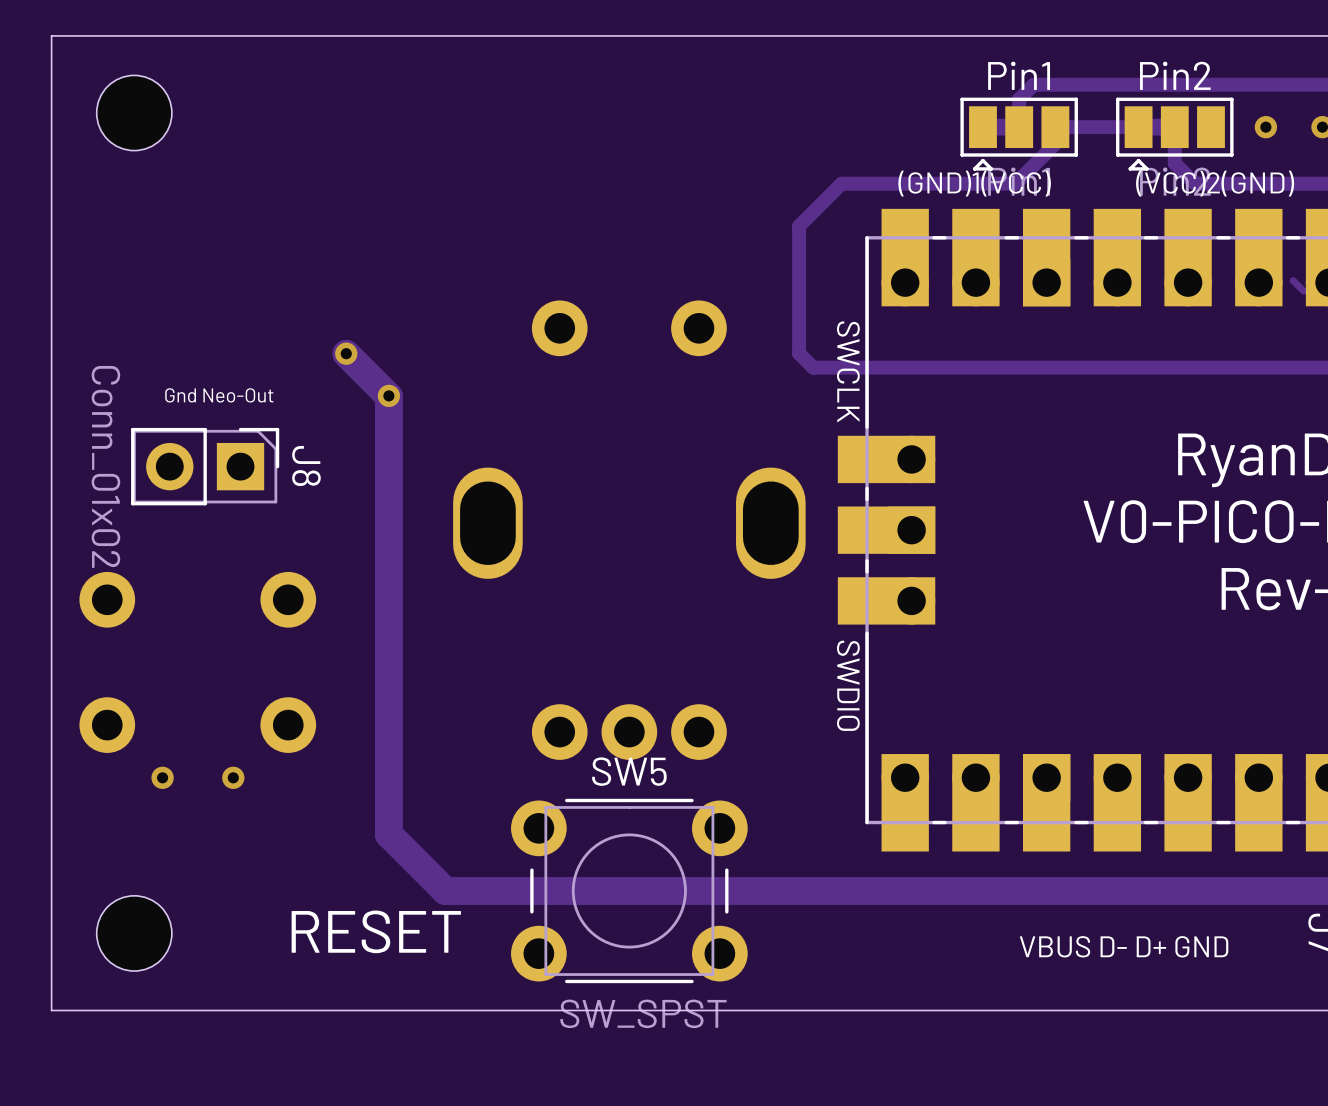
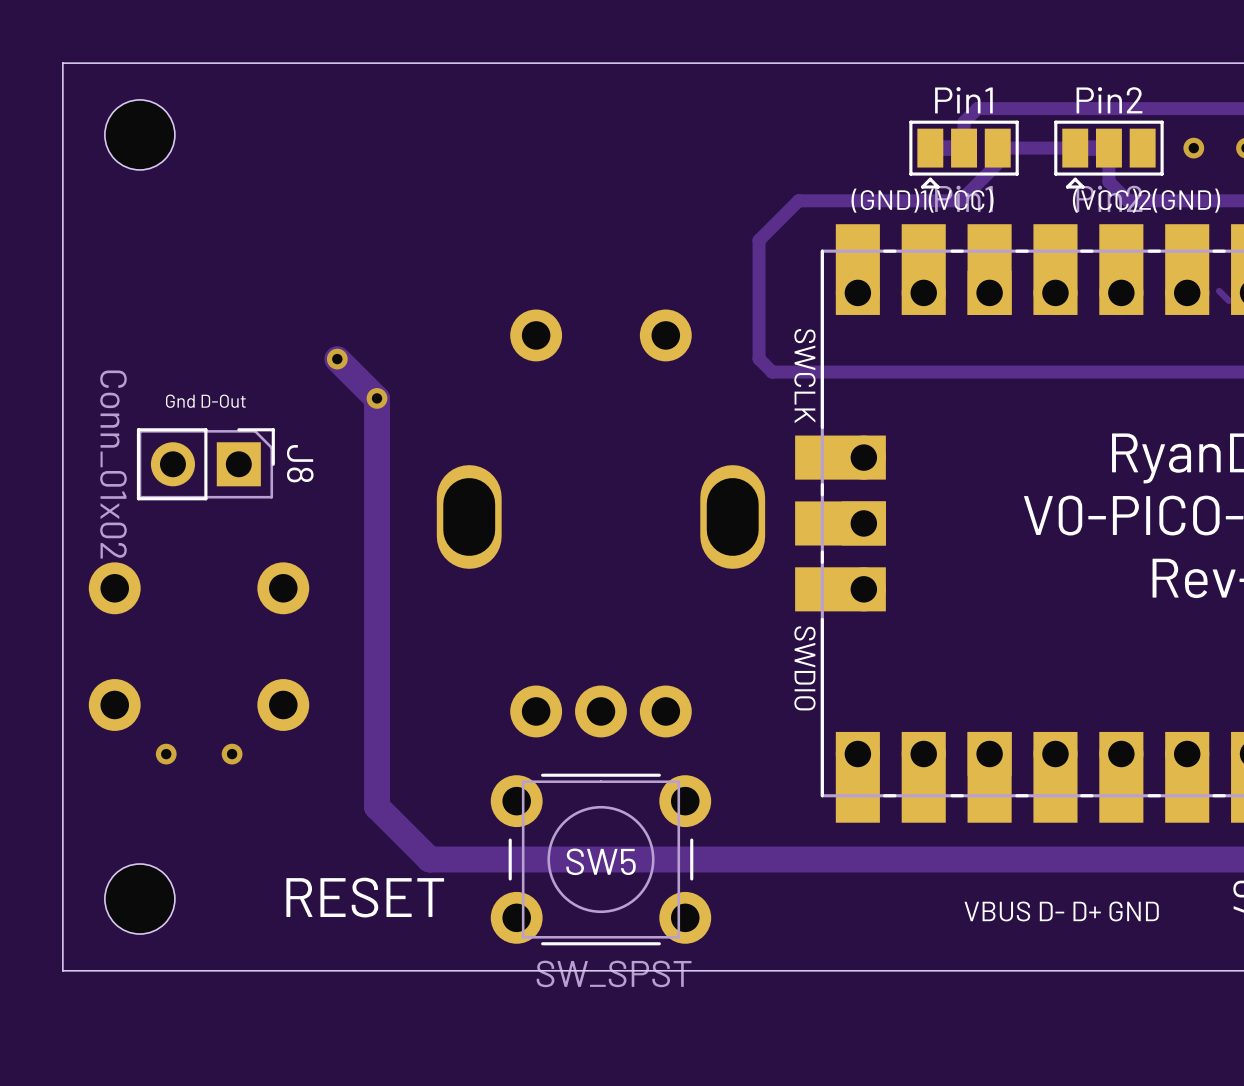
text: Gnd Neo-Out (219, 395) -> Gnd D-Out (205, 401)
SW5 name position: SW5 (629, 771) -> SW5 (601, 861)

